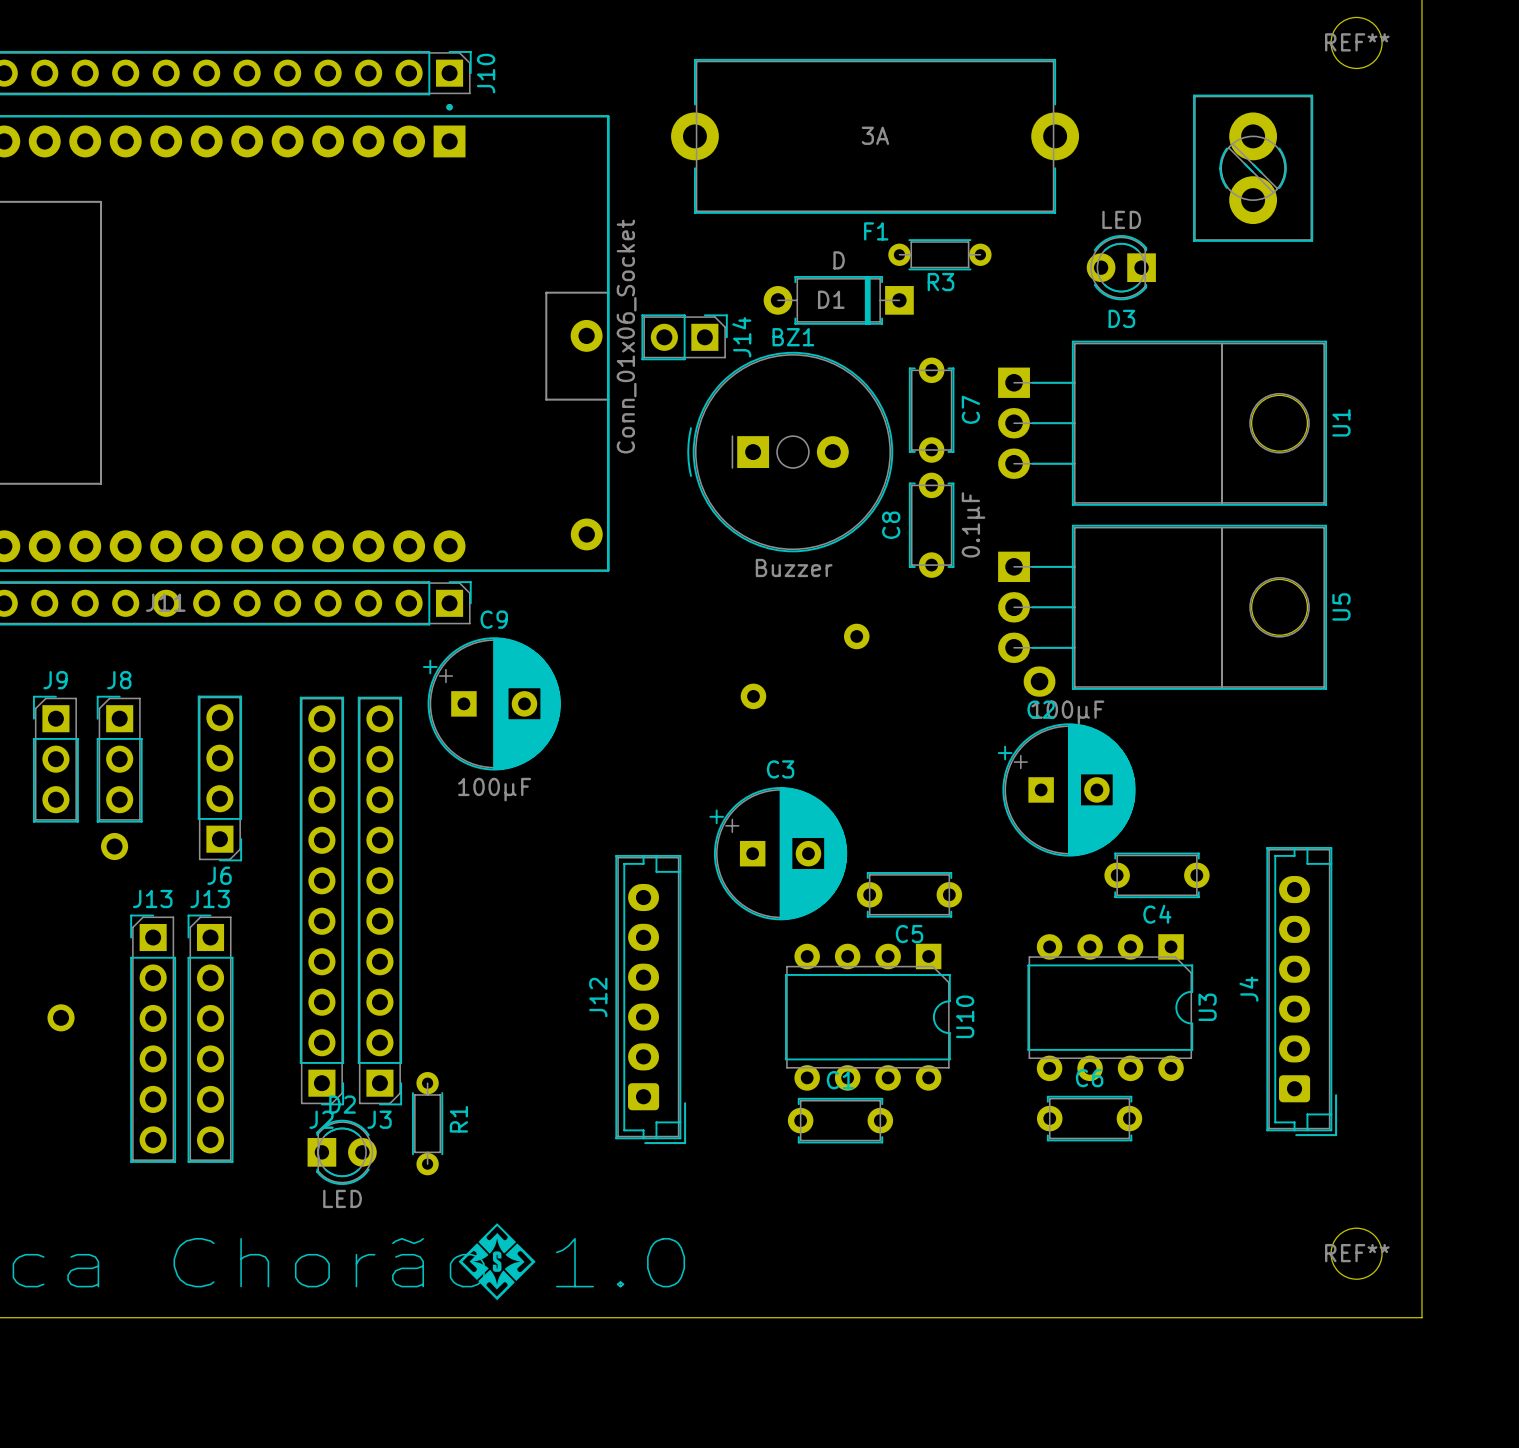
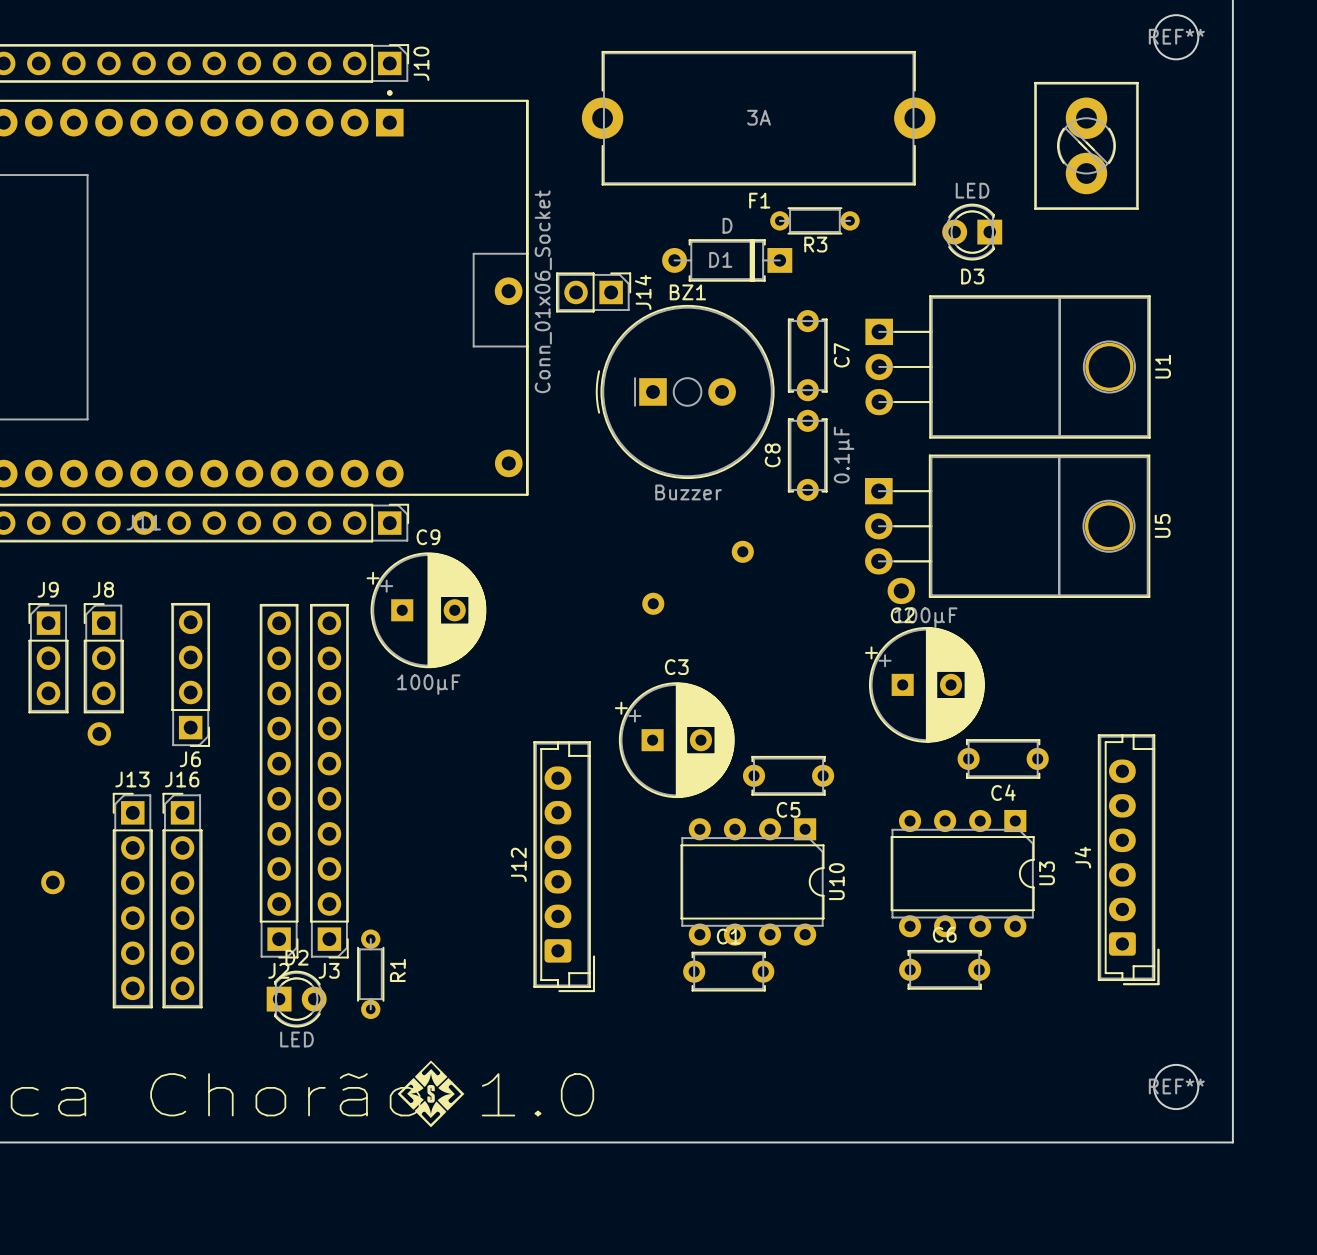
U1 footprint: [998, 340, 1328, 506] -> [865, 295, 1151, 439]
U5 footprint: [998, 524, 1328, 690] -> [864, 454, 1151, 598]
J13 name: J13 (210, 898) -> J16 (182, 779)

